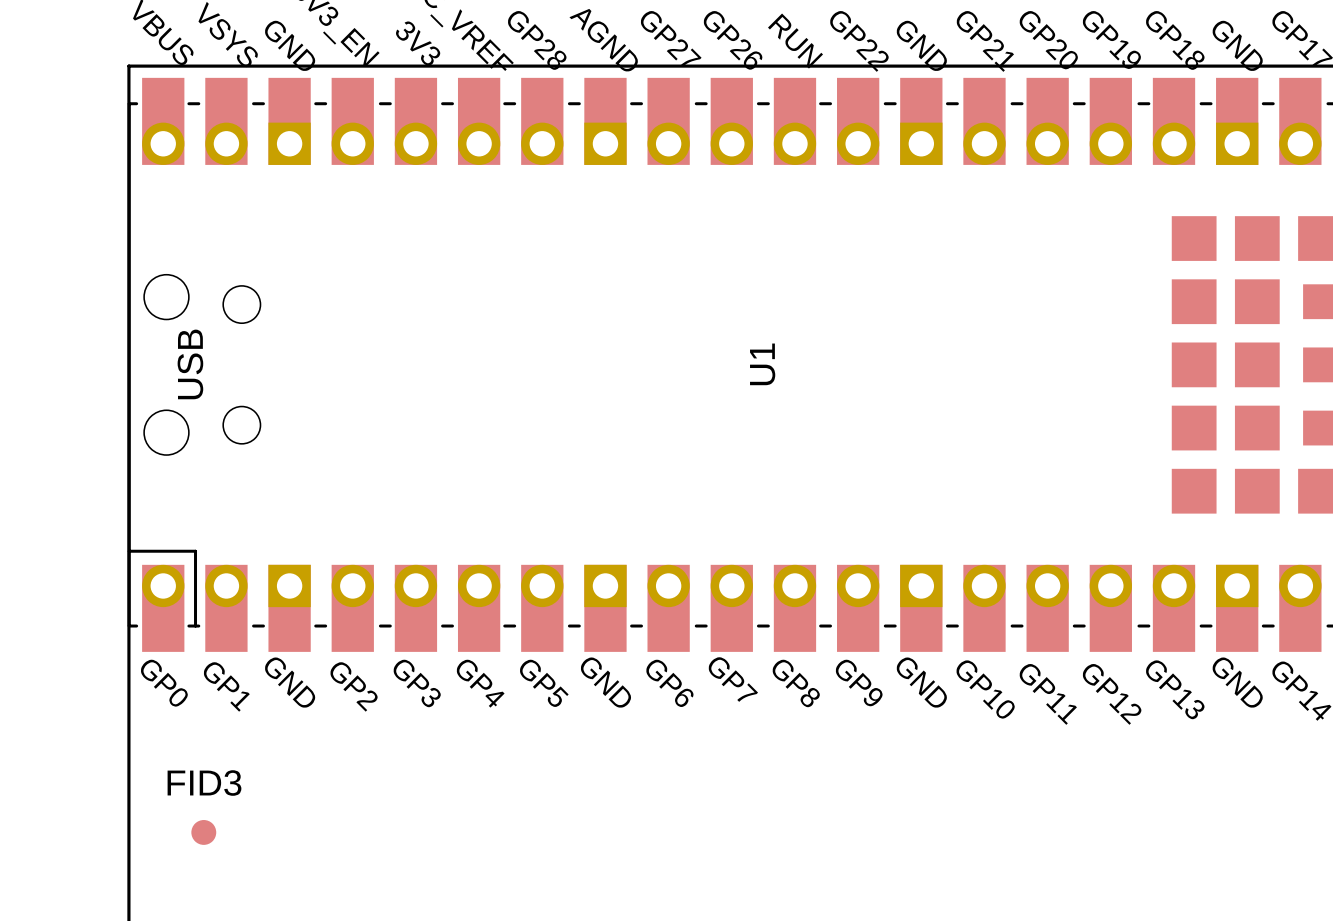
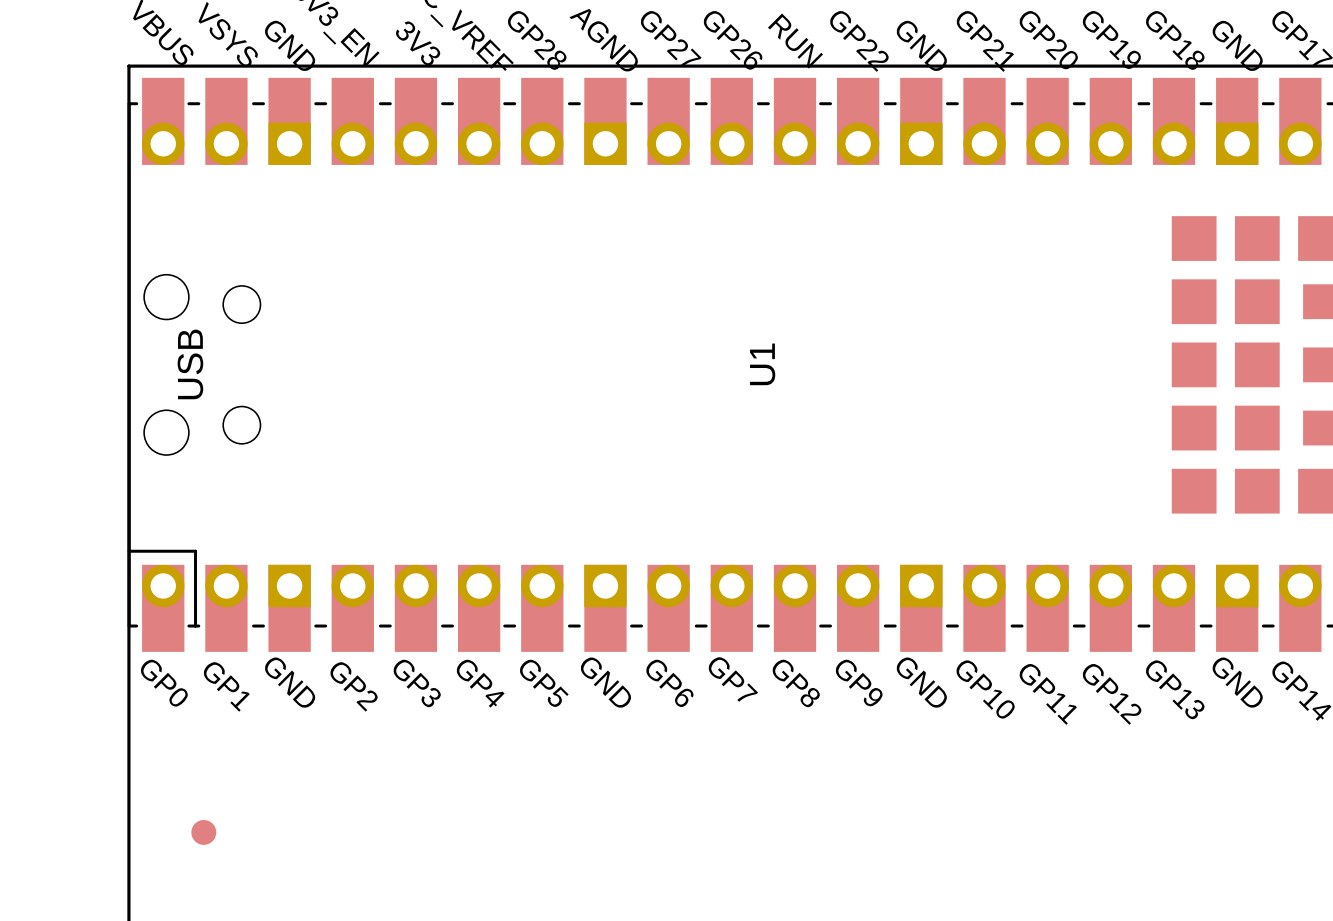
FID3 name: FID3 (204, 783) -> none

